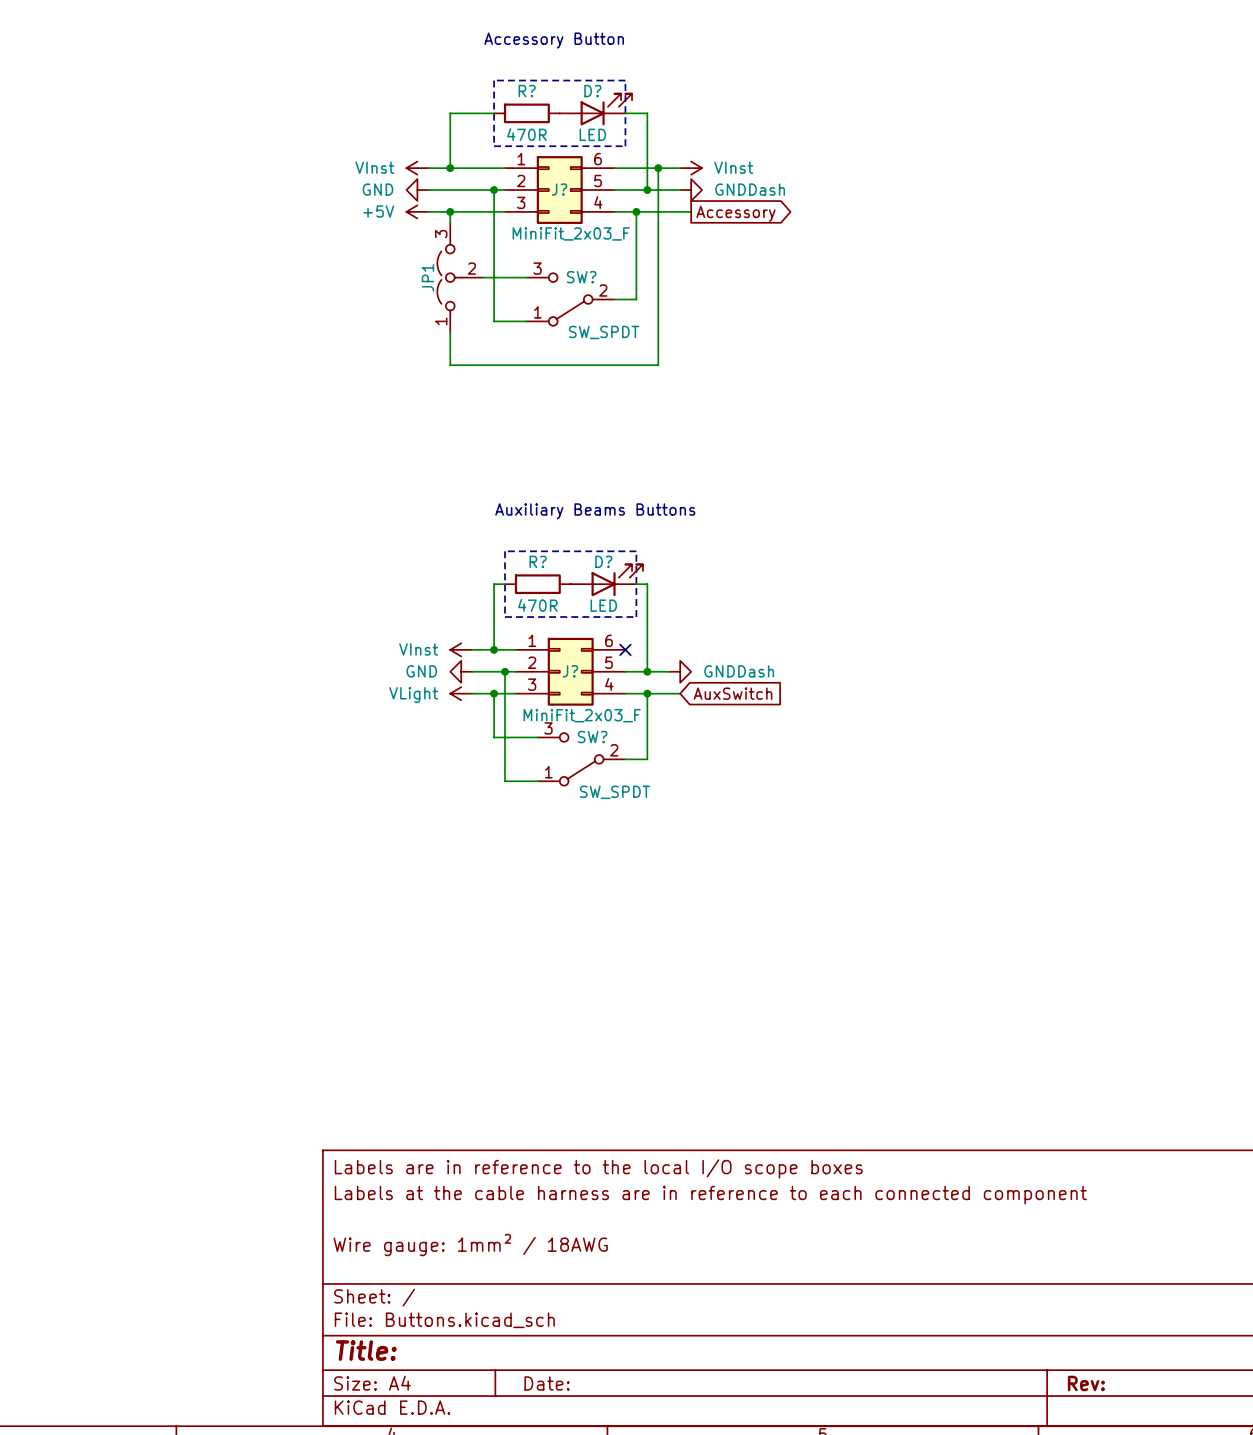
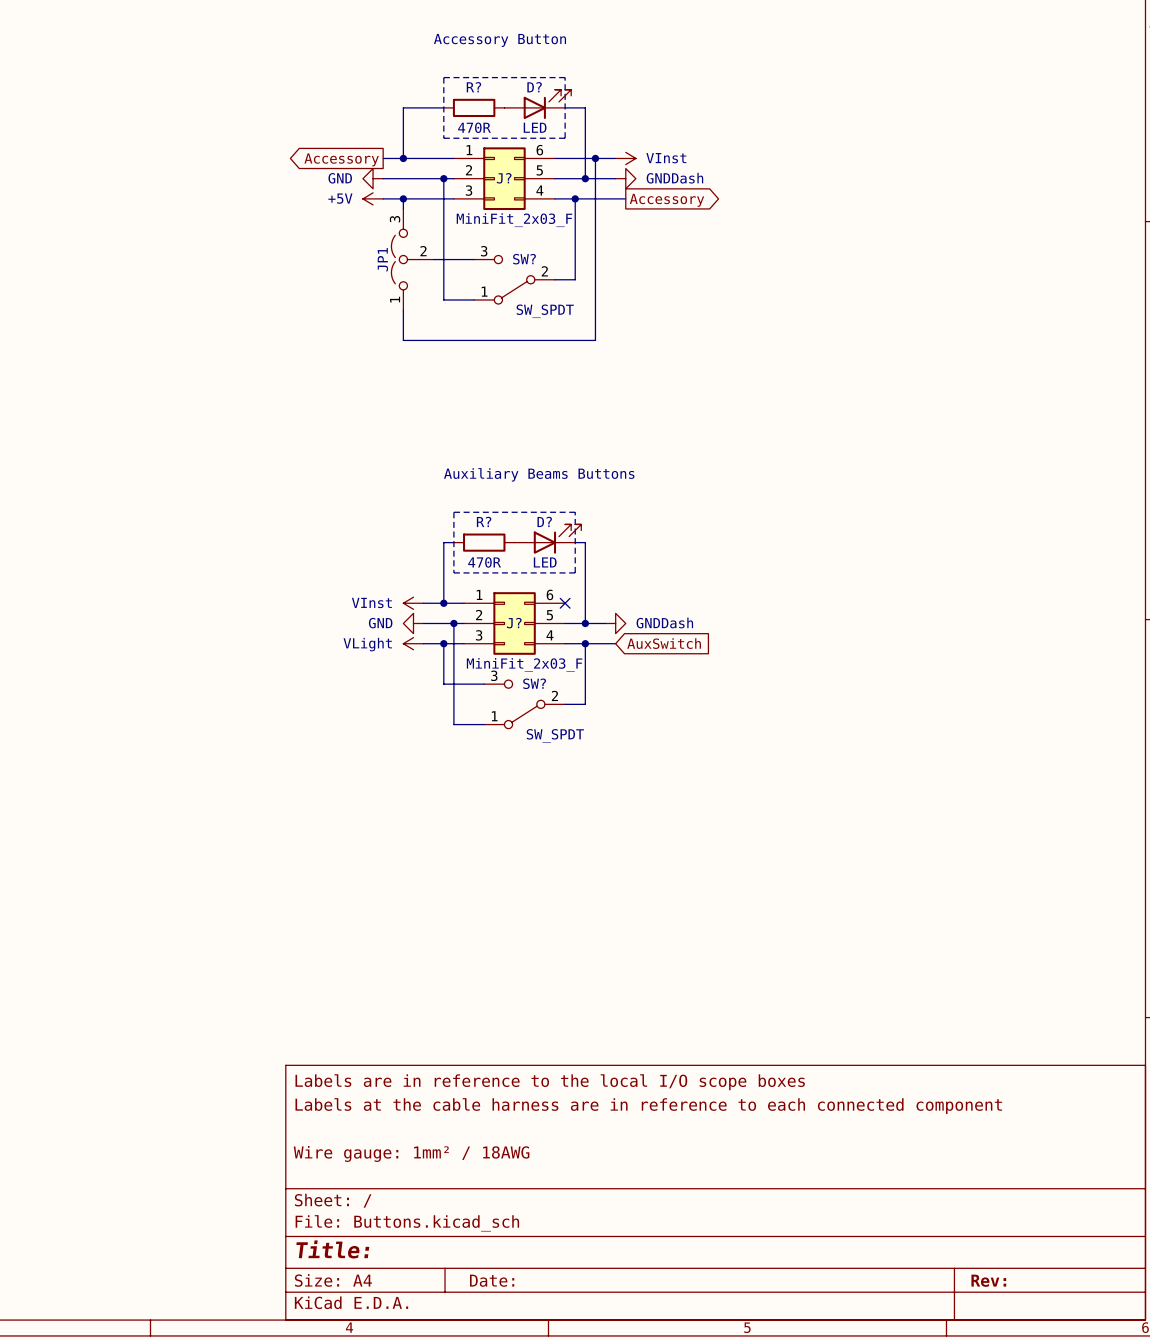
power symbol: VInst (417, 168) -> none
global label: none -> Accessory (341, 159)

